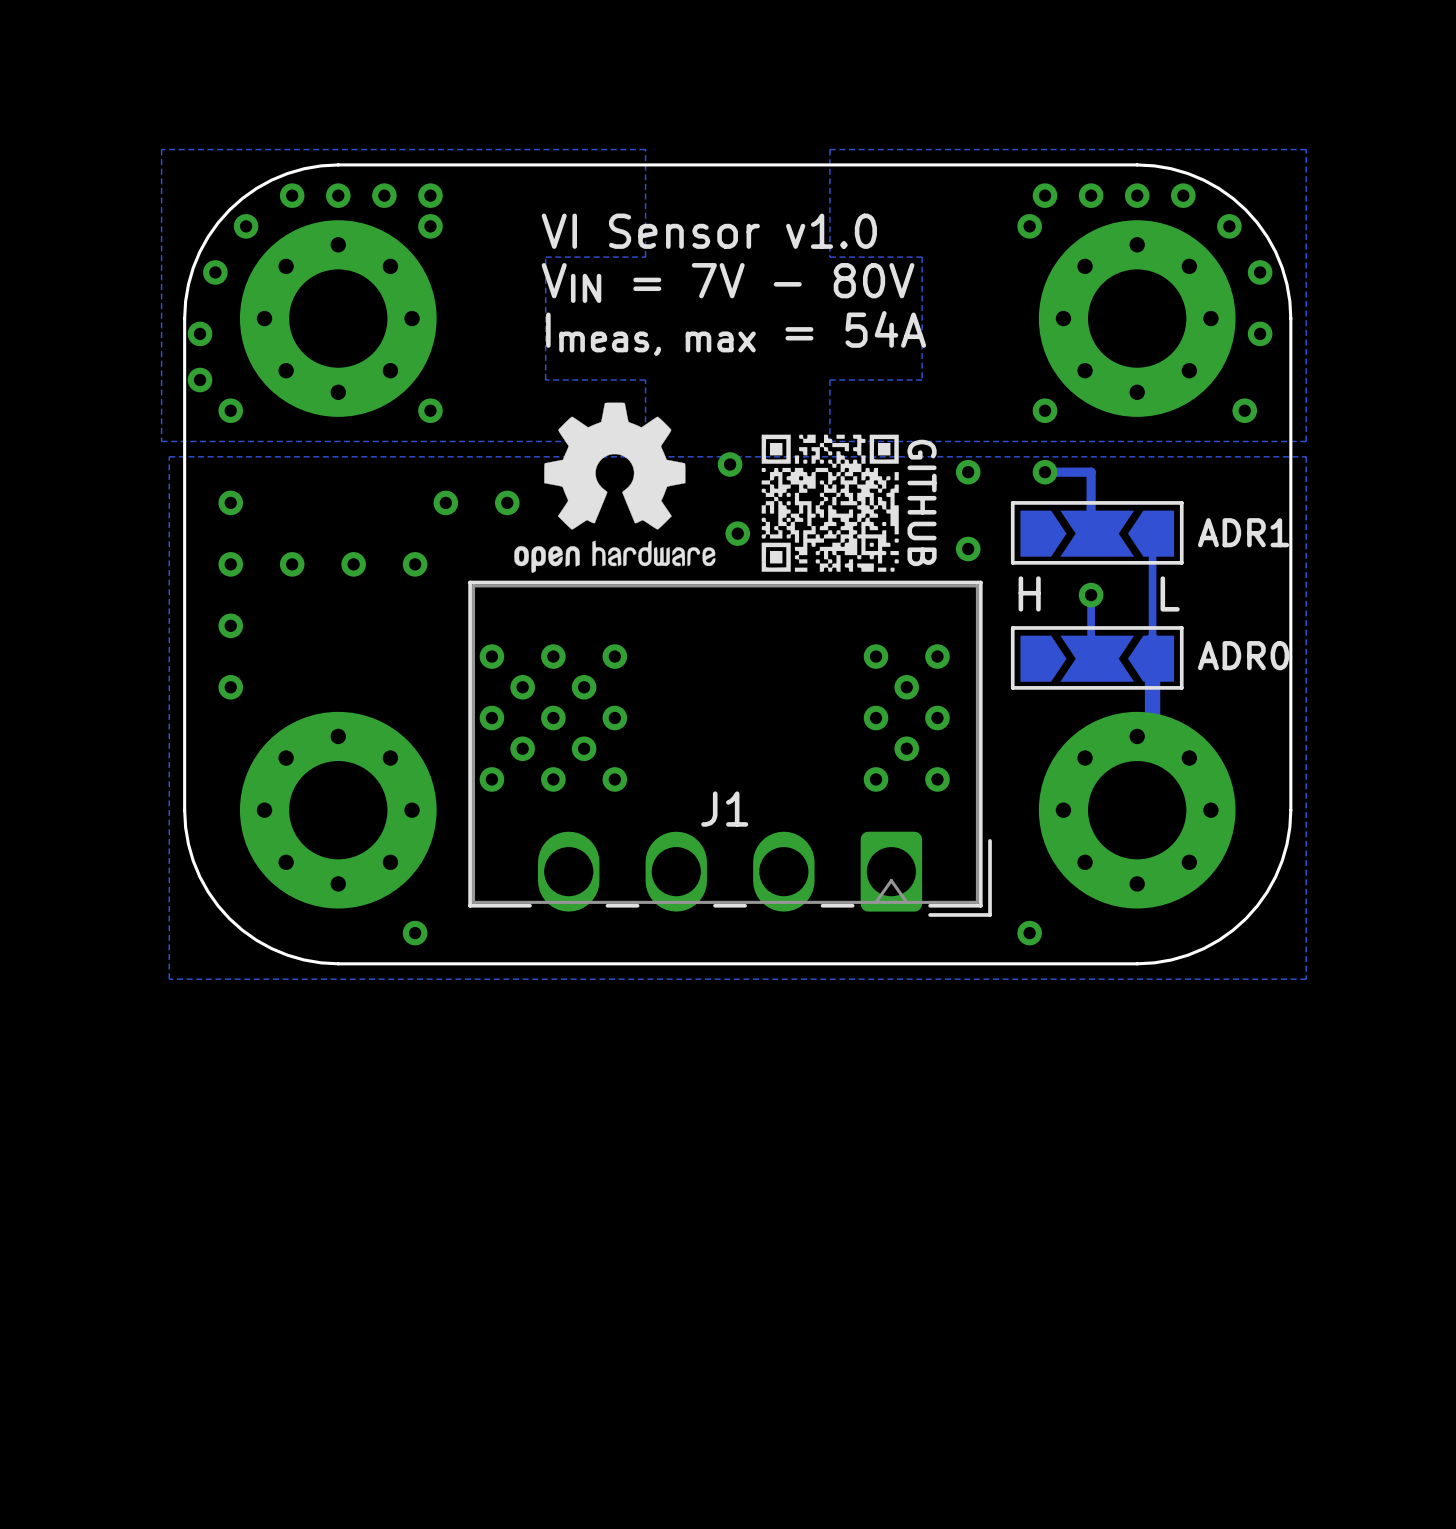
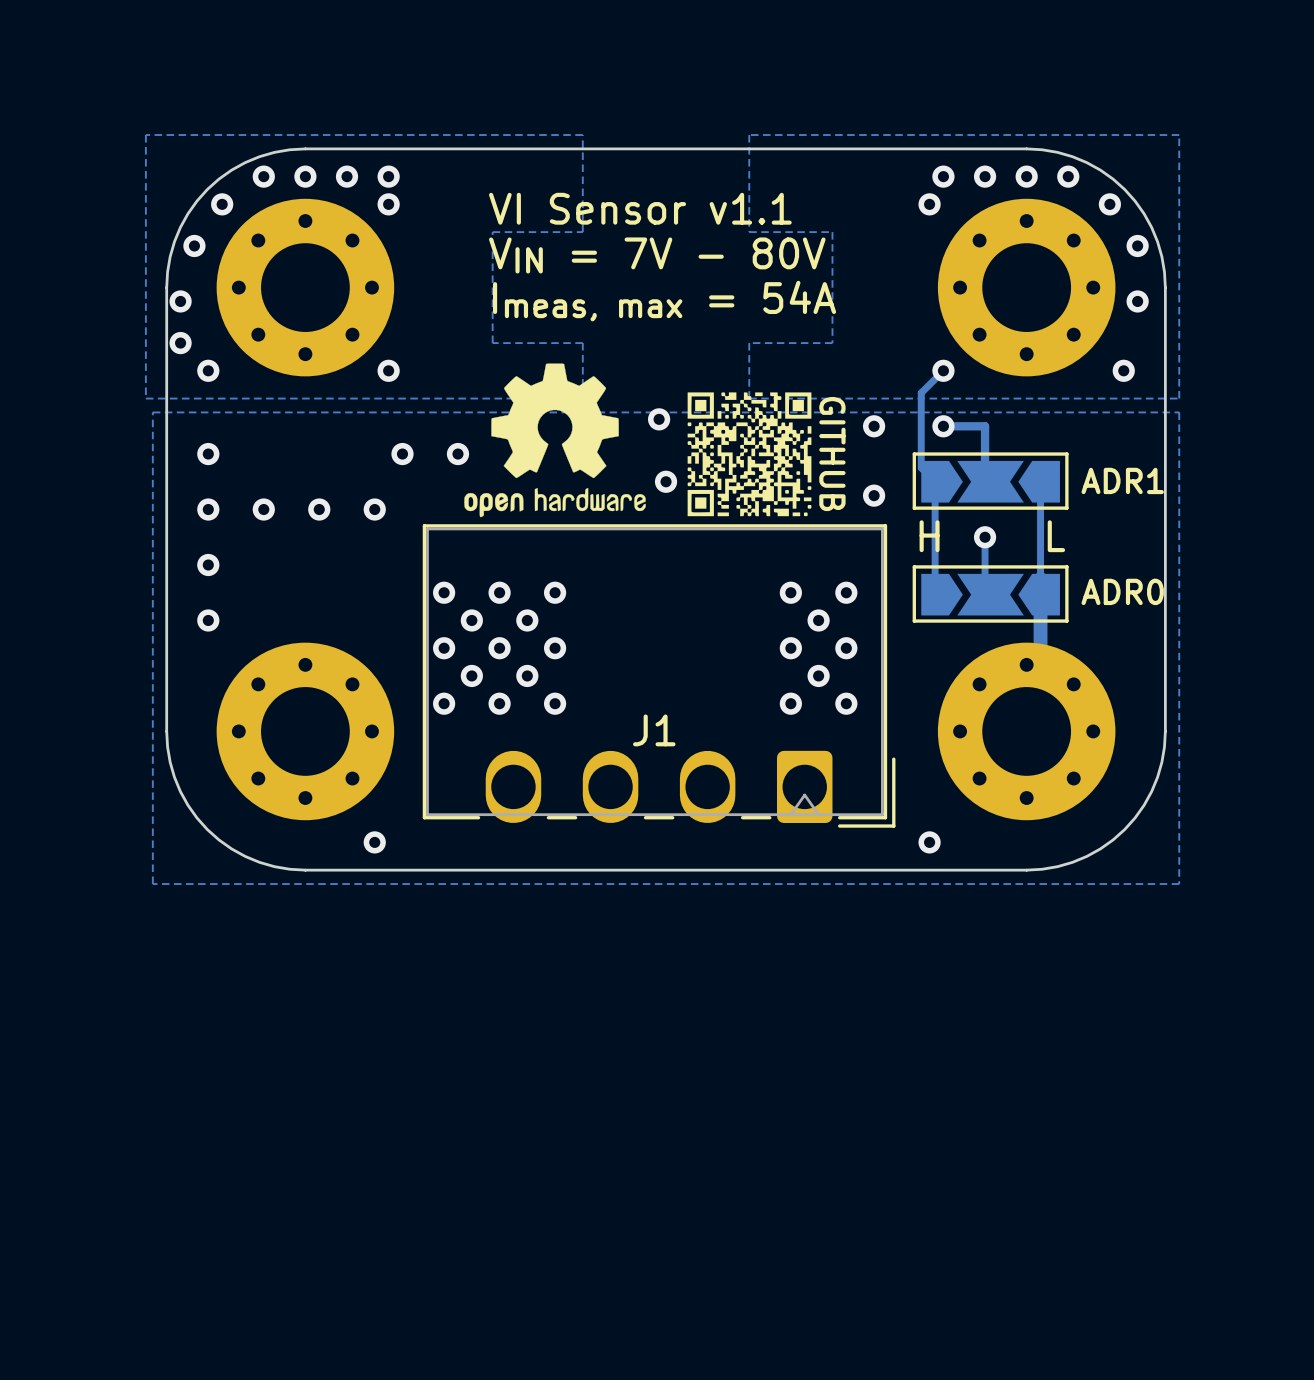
text: VI Sensor v1.0 (709, 231) -> VI Sensor v1.1 (640, 208)
track: none -> (943, 370) (921, 393) (921, 467) (935, 481) (935, 594)

